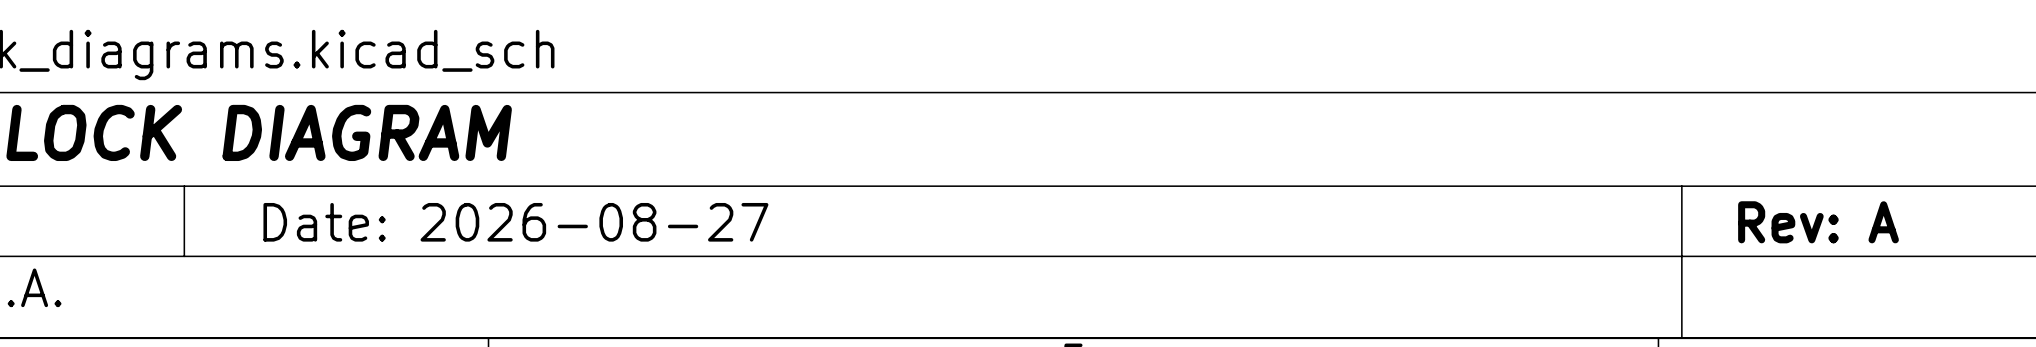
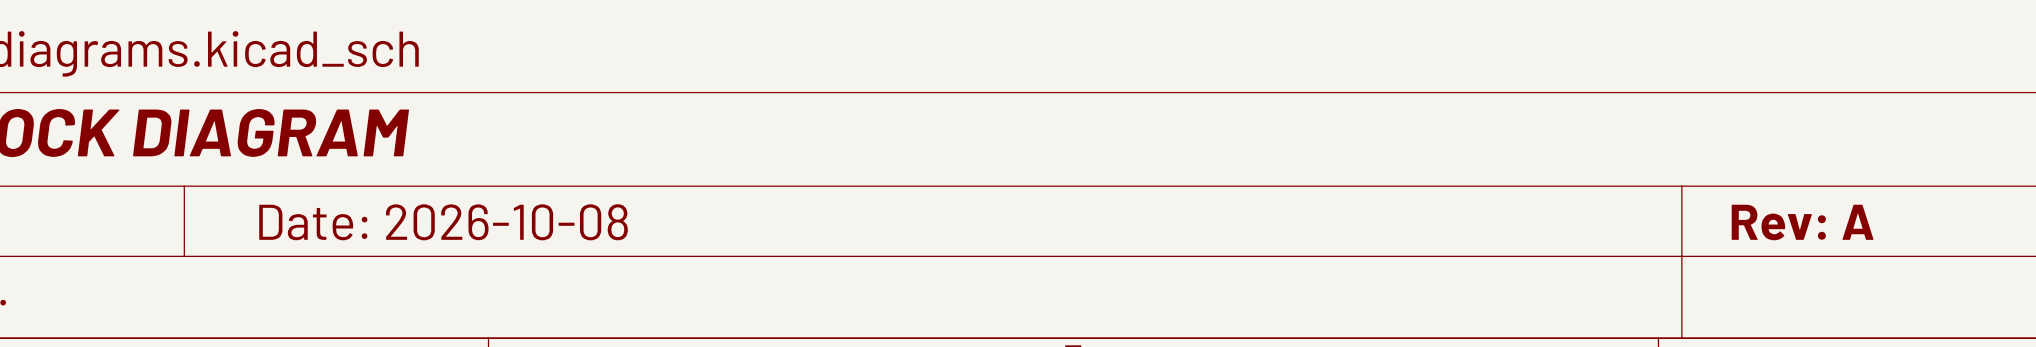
title block: Date: 2026-08-27 (515, 222) -> Date: 2026-10-08 (443, 222)

